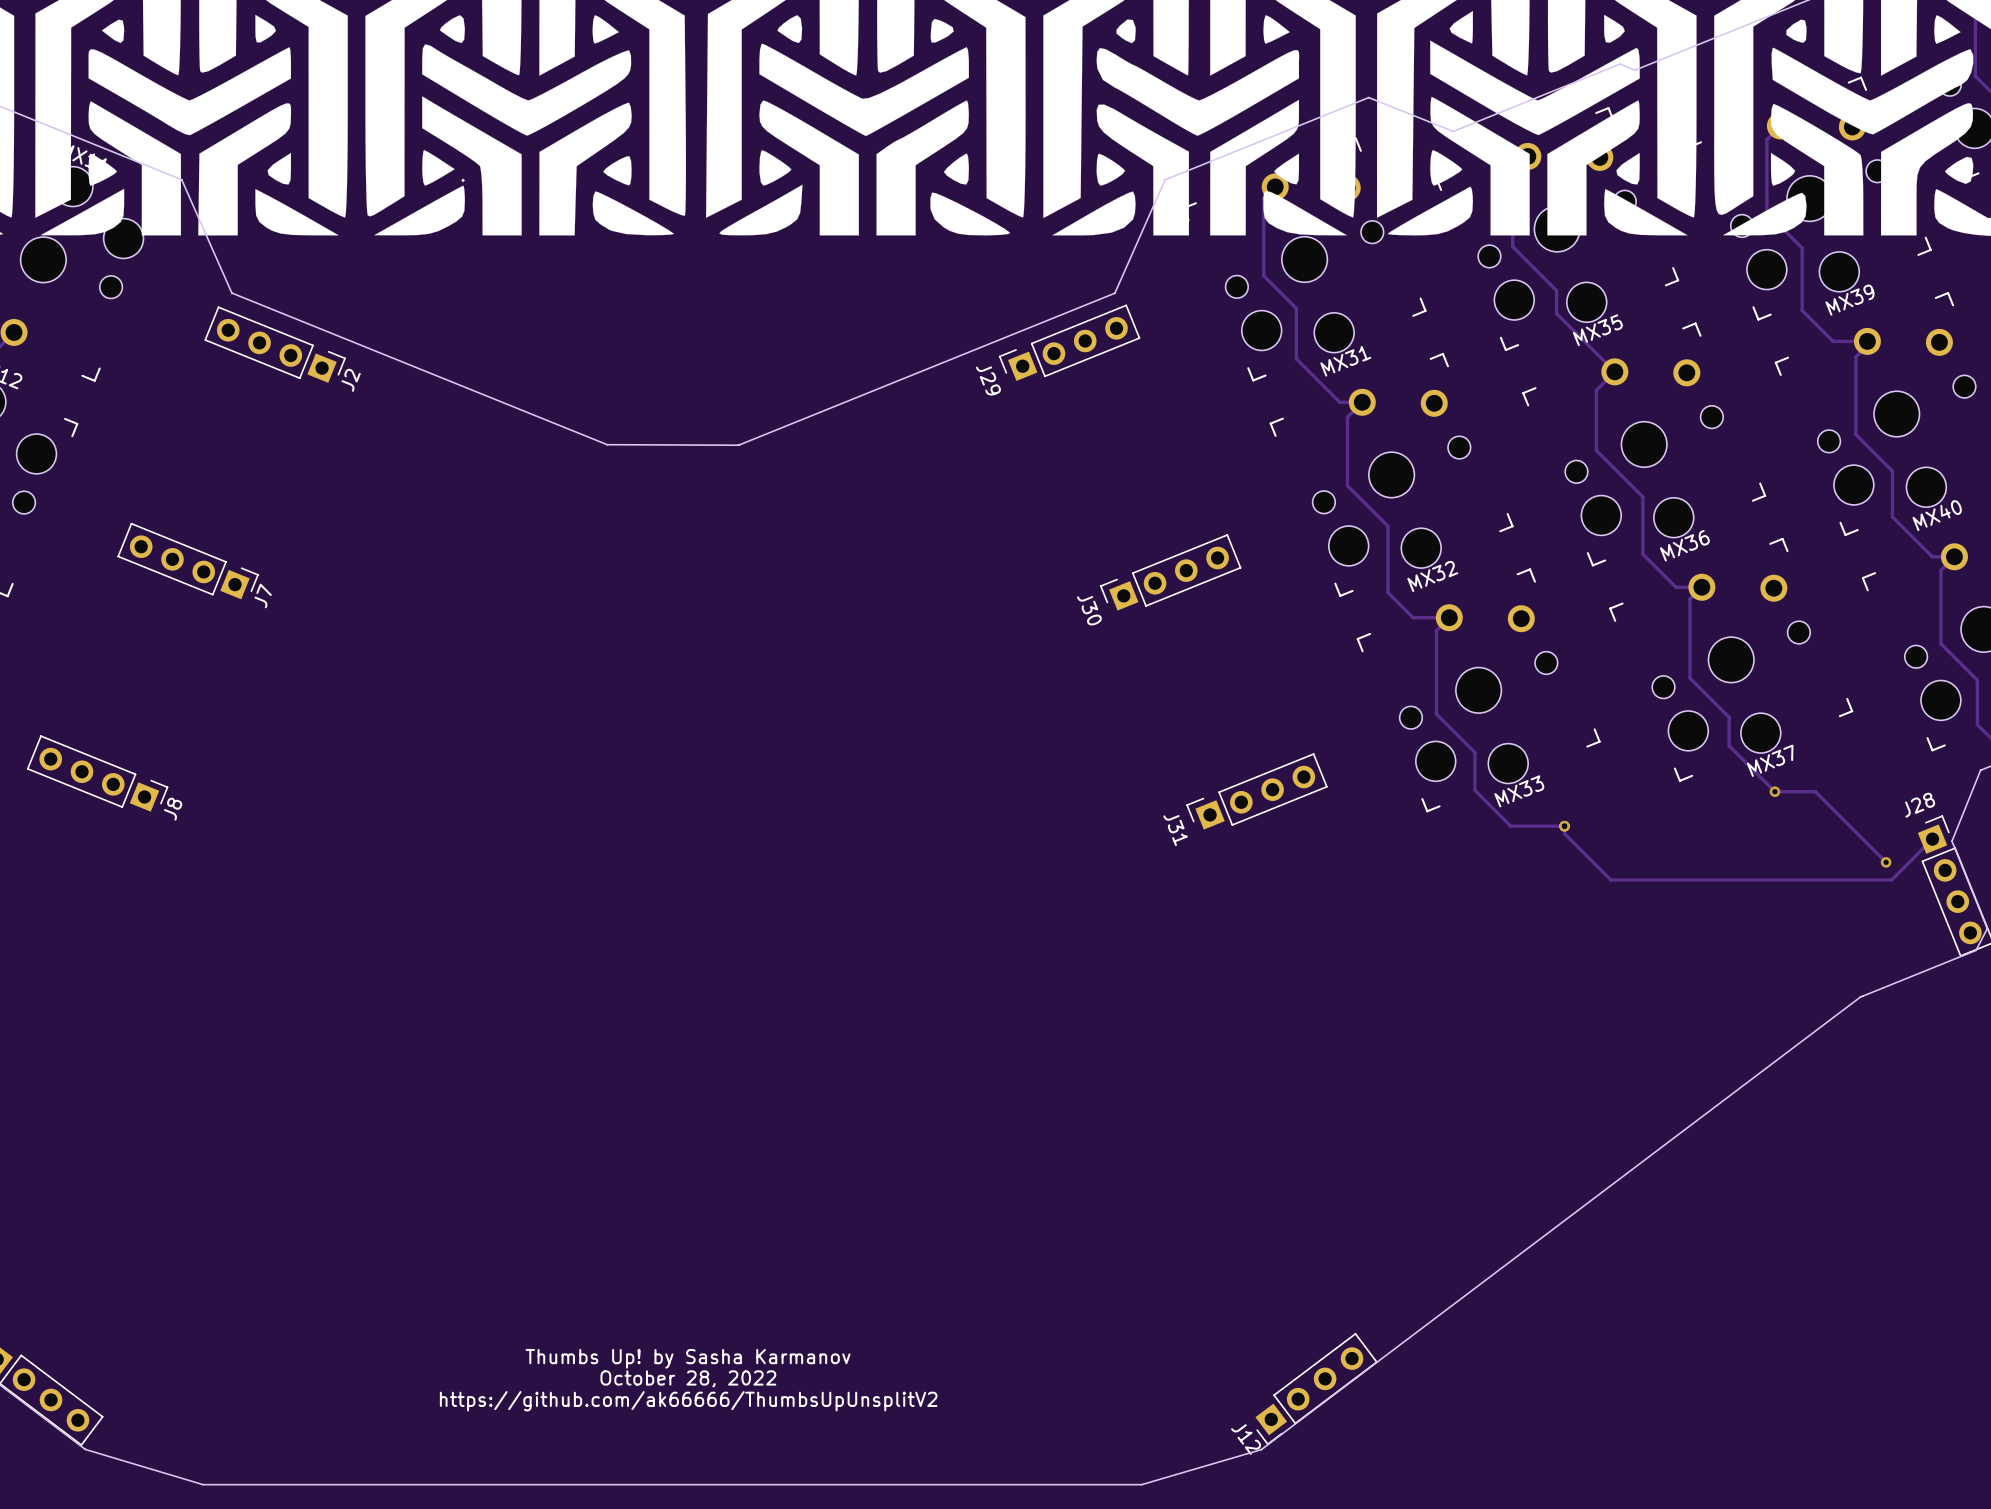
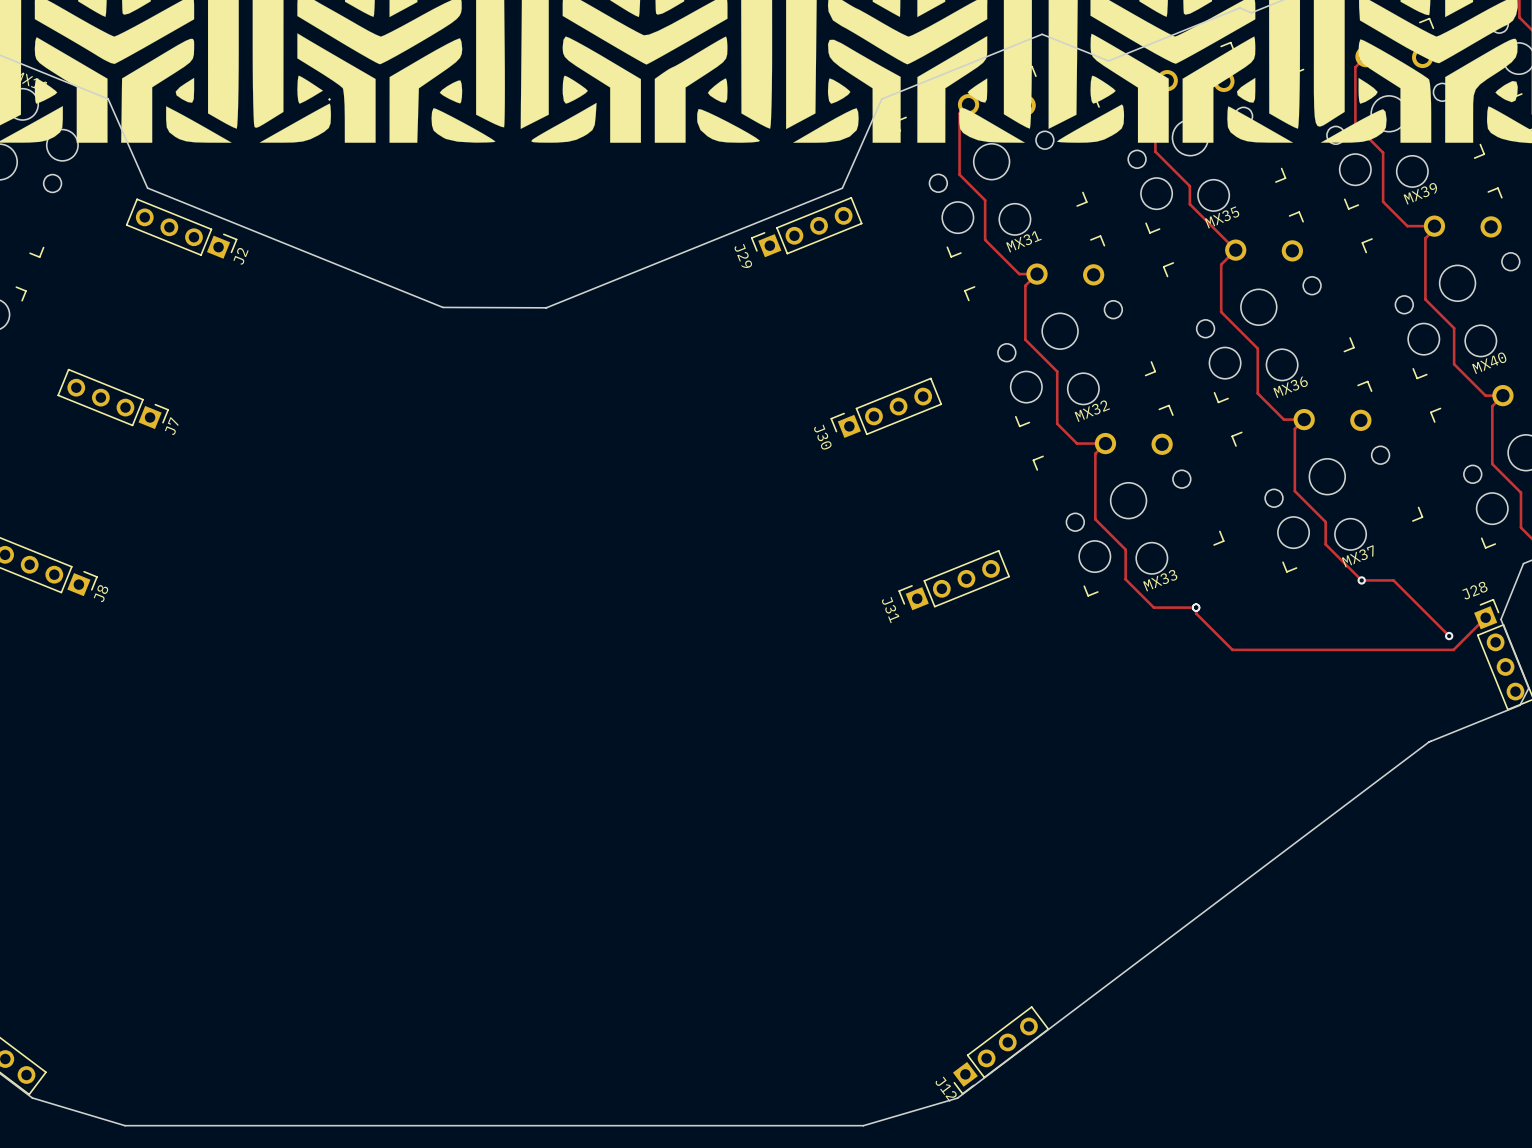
text: Thumbs Up! by Sasha Karmanov (688, 1358) -> none
text: October 28, 2022 (688, 1378) -> none
text: https://github.com/ak66666/ThumbsUpUnsplitV2 (688, 1401) -> none

